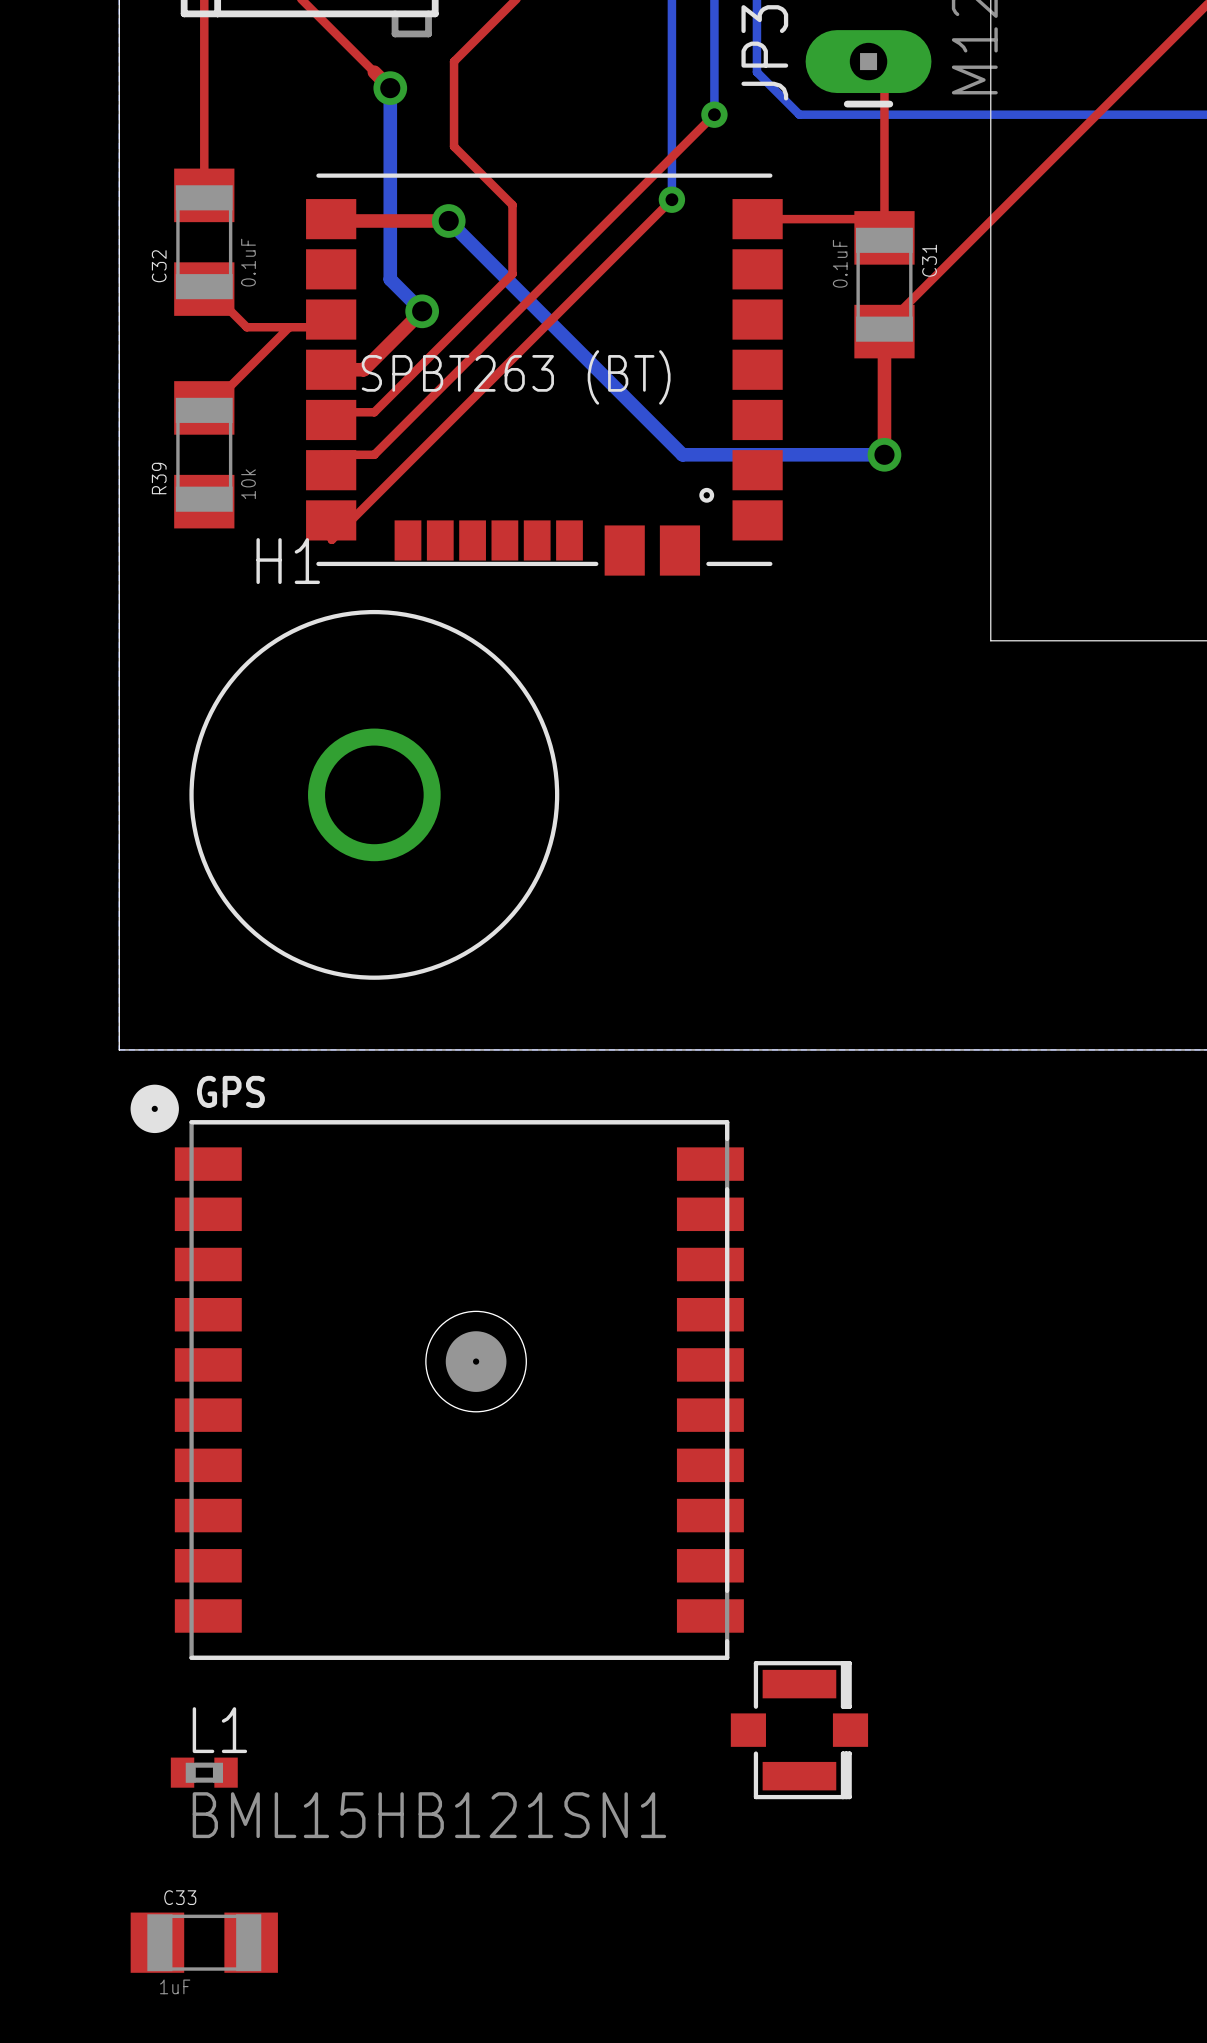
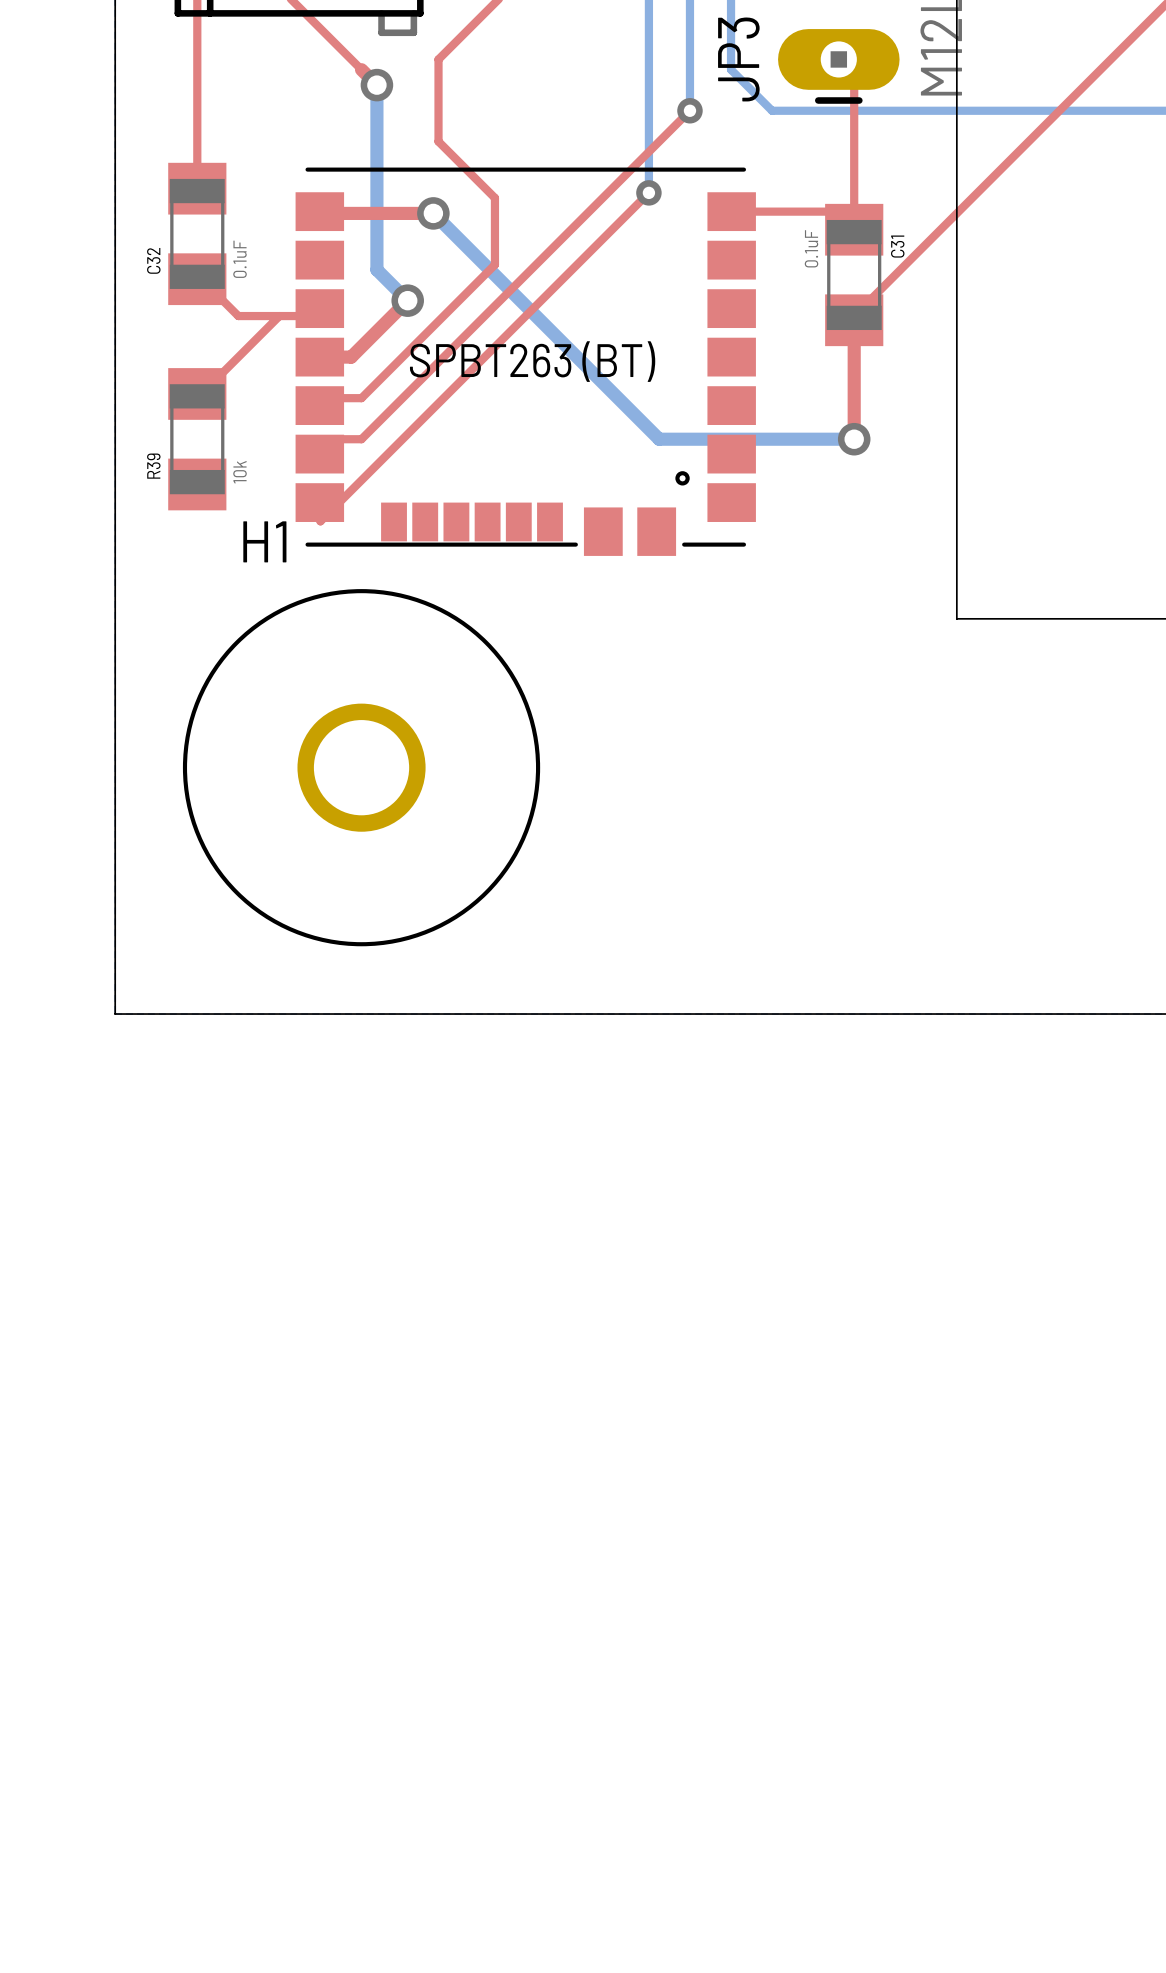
GPS: (437, 1372) -> none
part: (799, 1730) -> none
L1: BML15HB121SN1 (204, 1772) -> none
C33: 1uF (204, 1942) -> none

